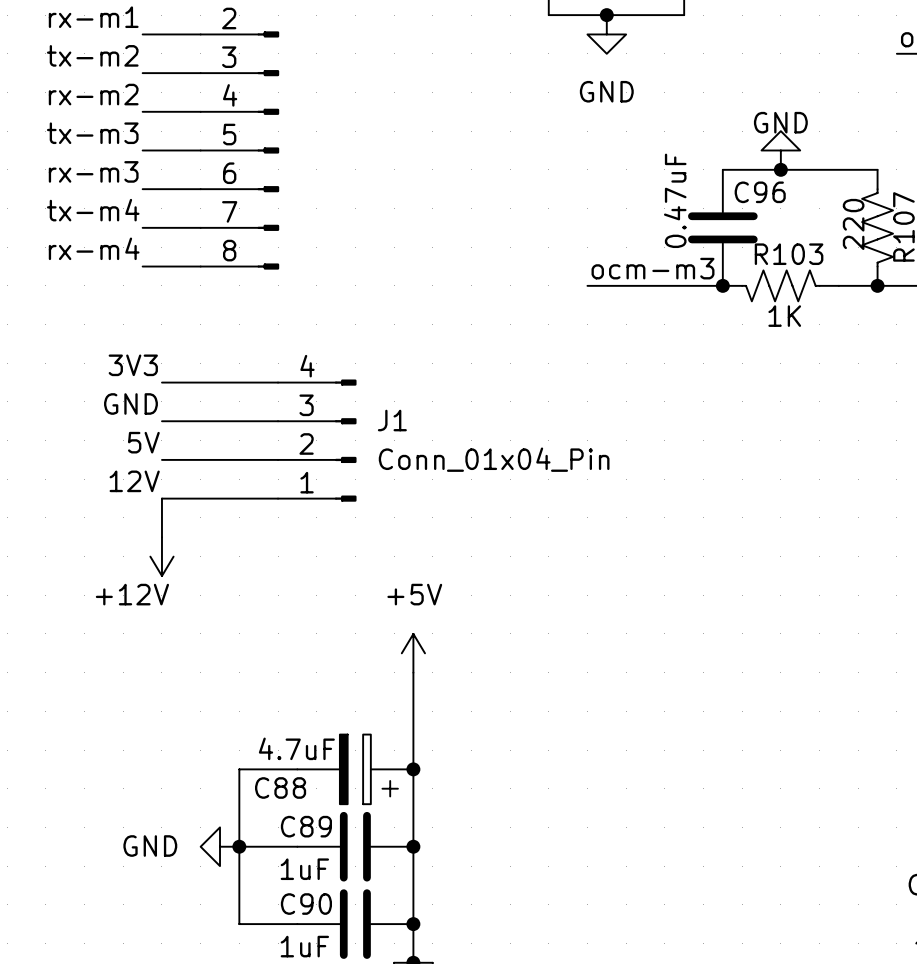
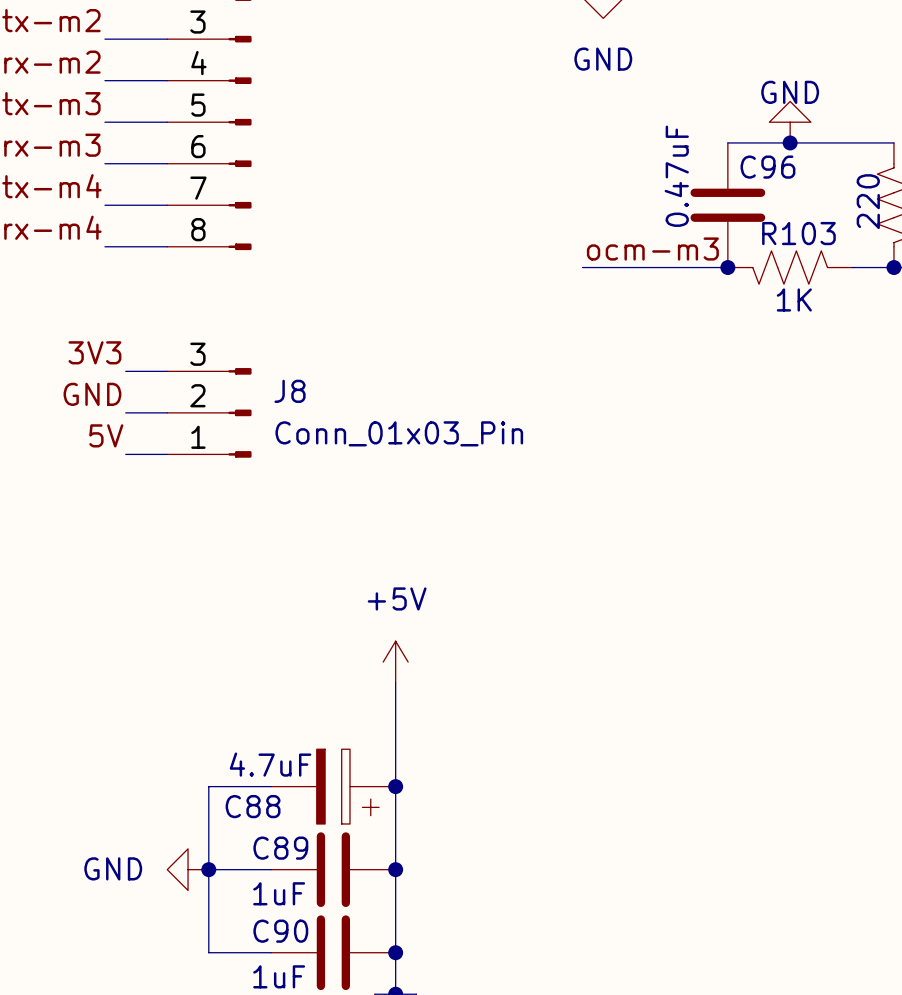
J8: none -> Conn_01x03_Pin (209, 412)
J1: Conn_01x04_Pin (317, 440) -> none
label: 12V (134, 481) -> none
wire: (278, 498) (161, 498) (161, 537) -> none
power symbol: +12V (161, 556) -> none

